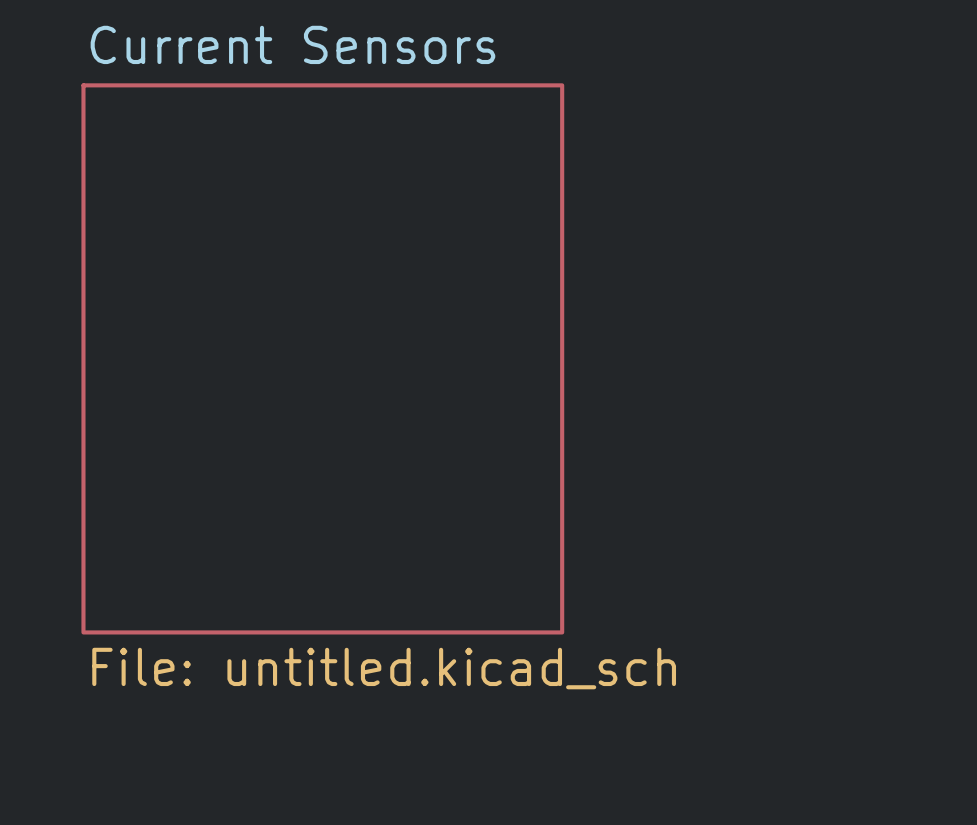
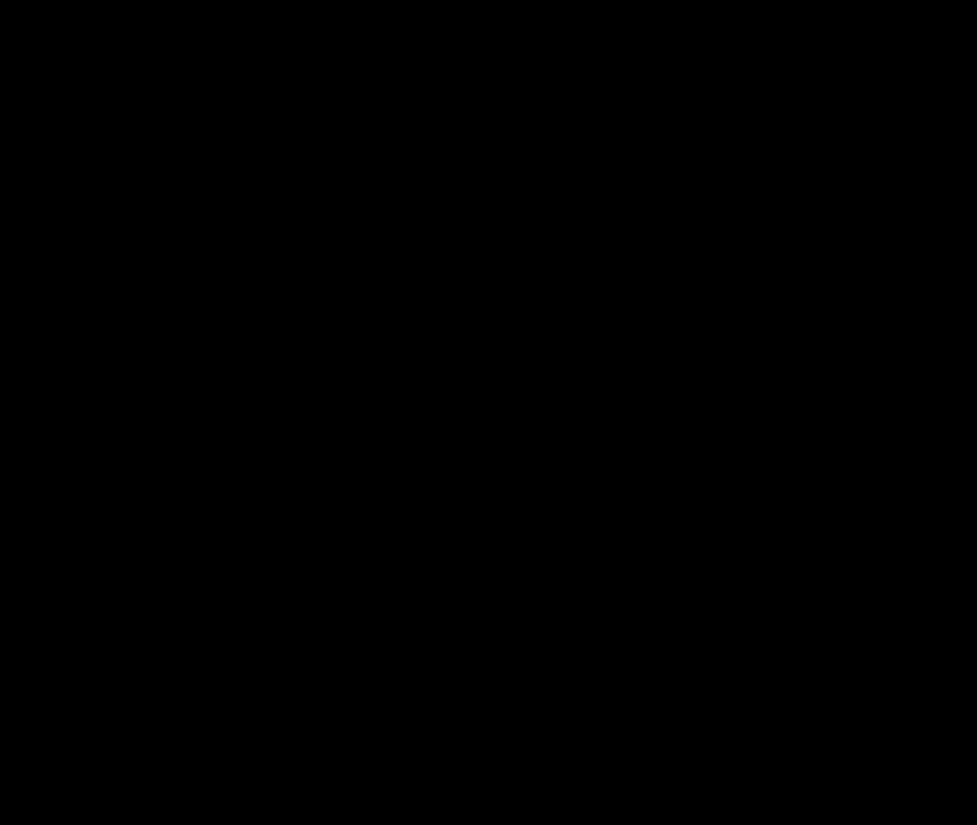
sheet Current Sensors: File: untitled.kicad_sch (322, 358) -> none

